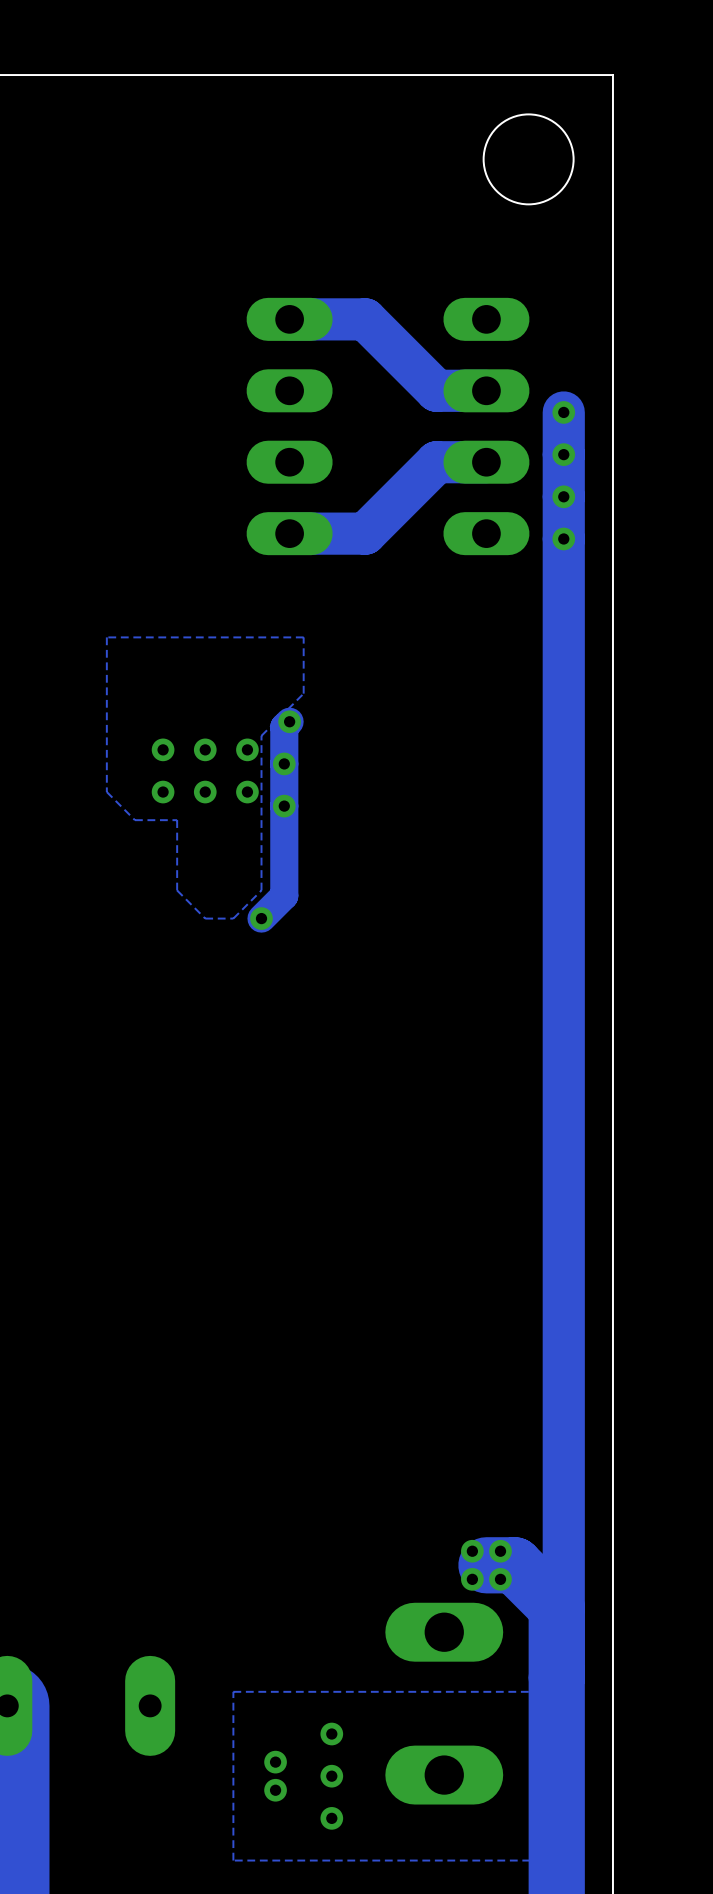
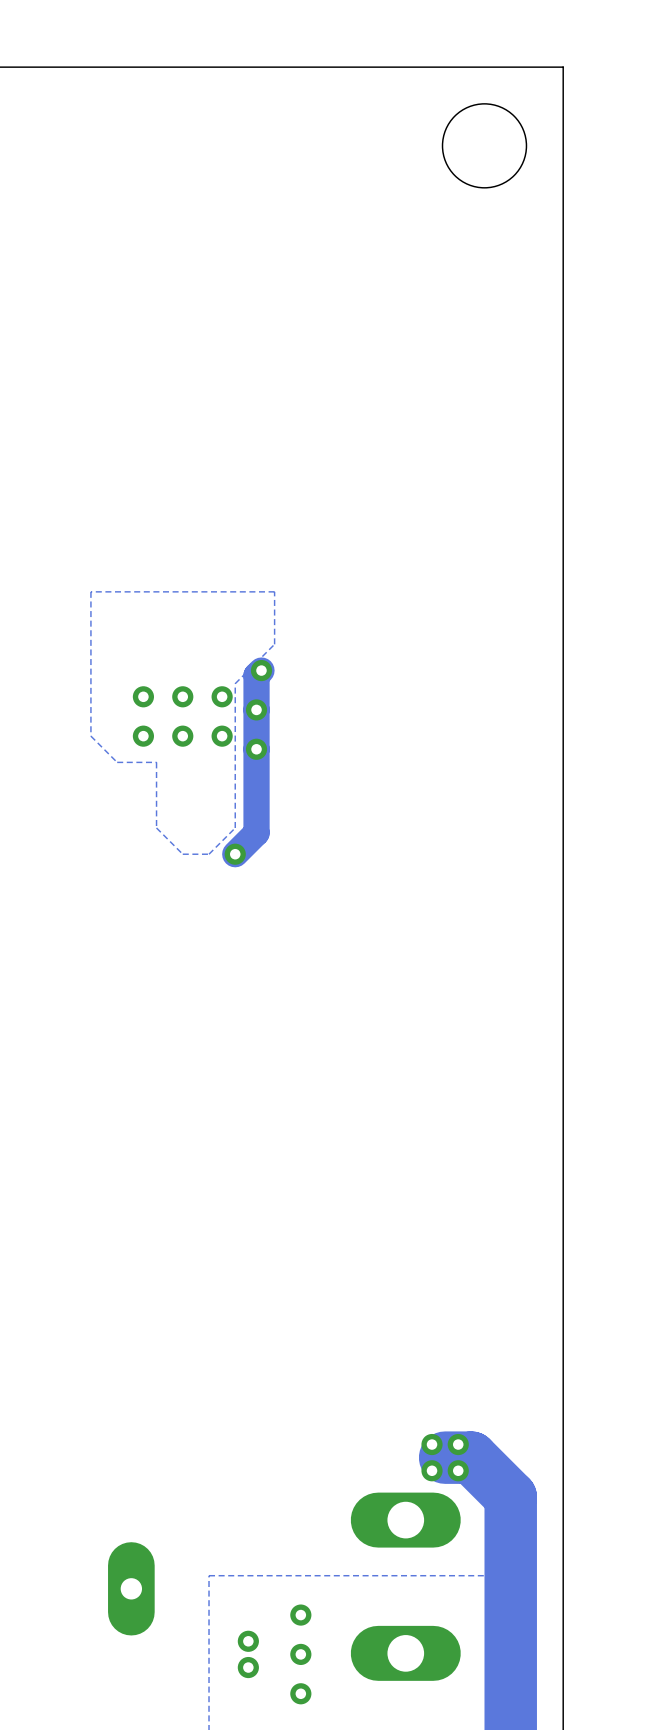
track: (289, 319) (365, 319) (436, 390) (486, 390) -> none
track: (563, 412) (563, 1670) (556, 1677) -> none
via: (563, 412) -> none
part: (289, 426) -> none
part: (486, 426) -> none
via: (563, 454) -> none
track: (486, 462) (436, 462) (365, 533) (289, 533) -> none
via: (563, 496) -> none
via: (563, 538) -> none

